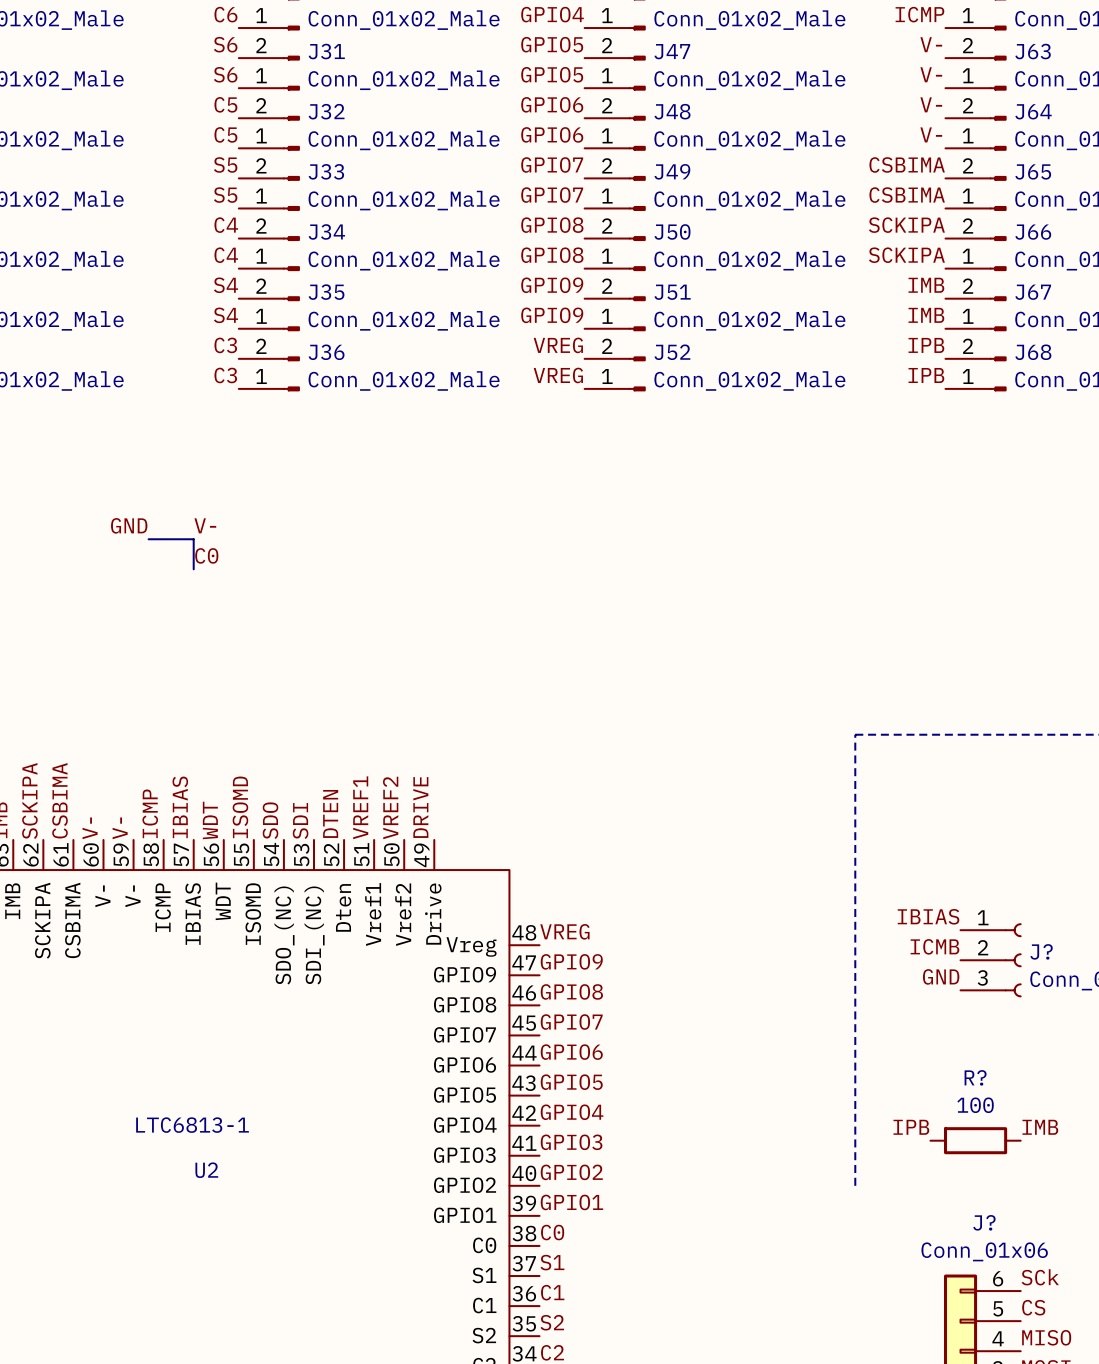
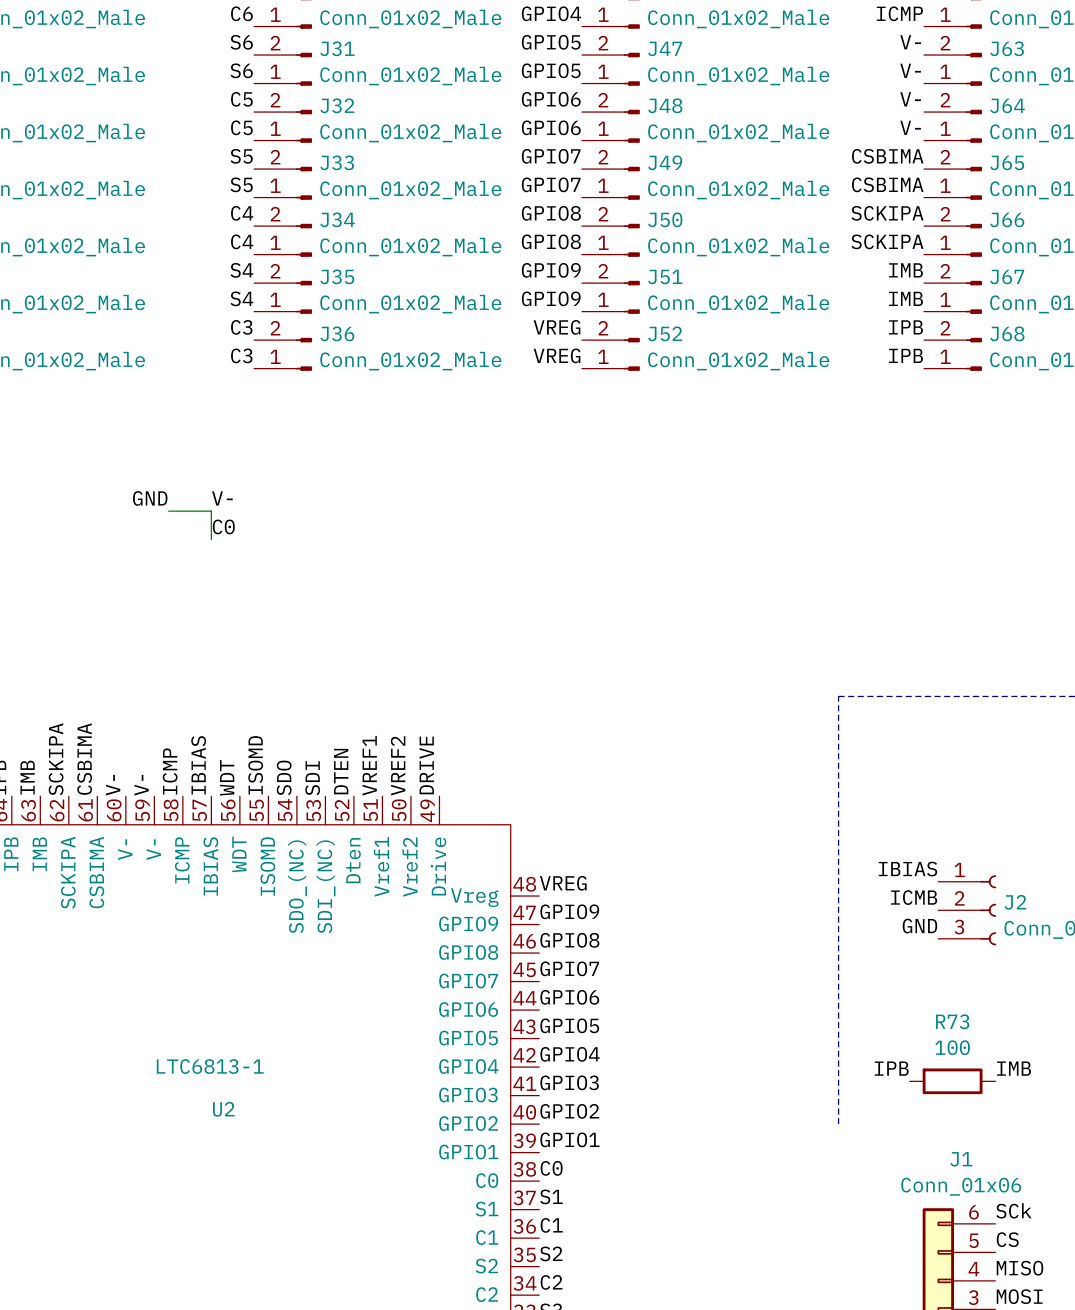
J? name: J? (1041, 951) -> J2 (1015, 902)
R? name: R? (975, 1077) -> R73 (952, 1021)
J? name: J? (984, 1222) -> J1 (961, 1159)

